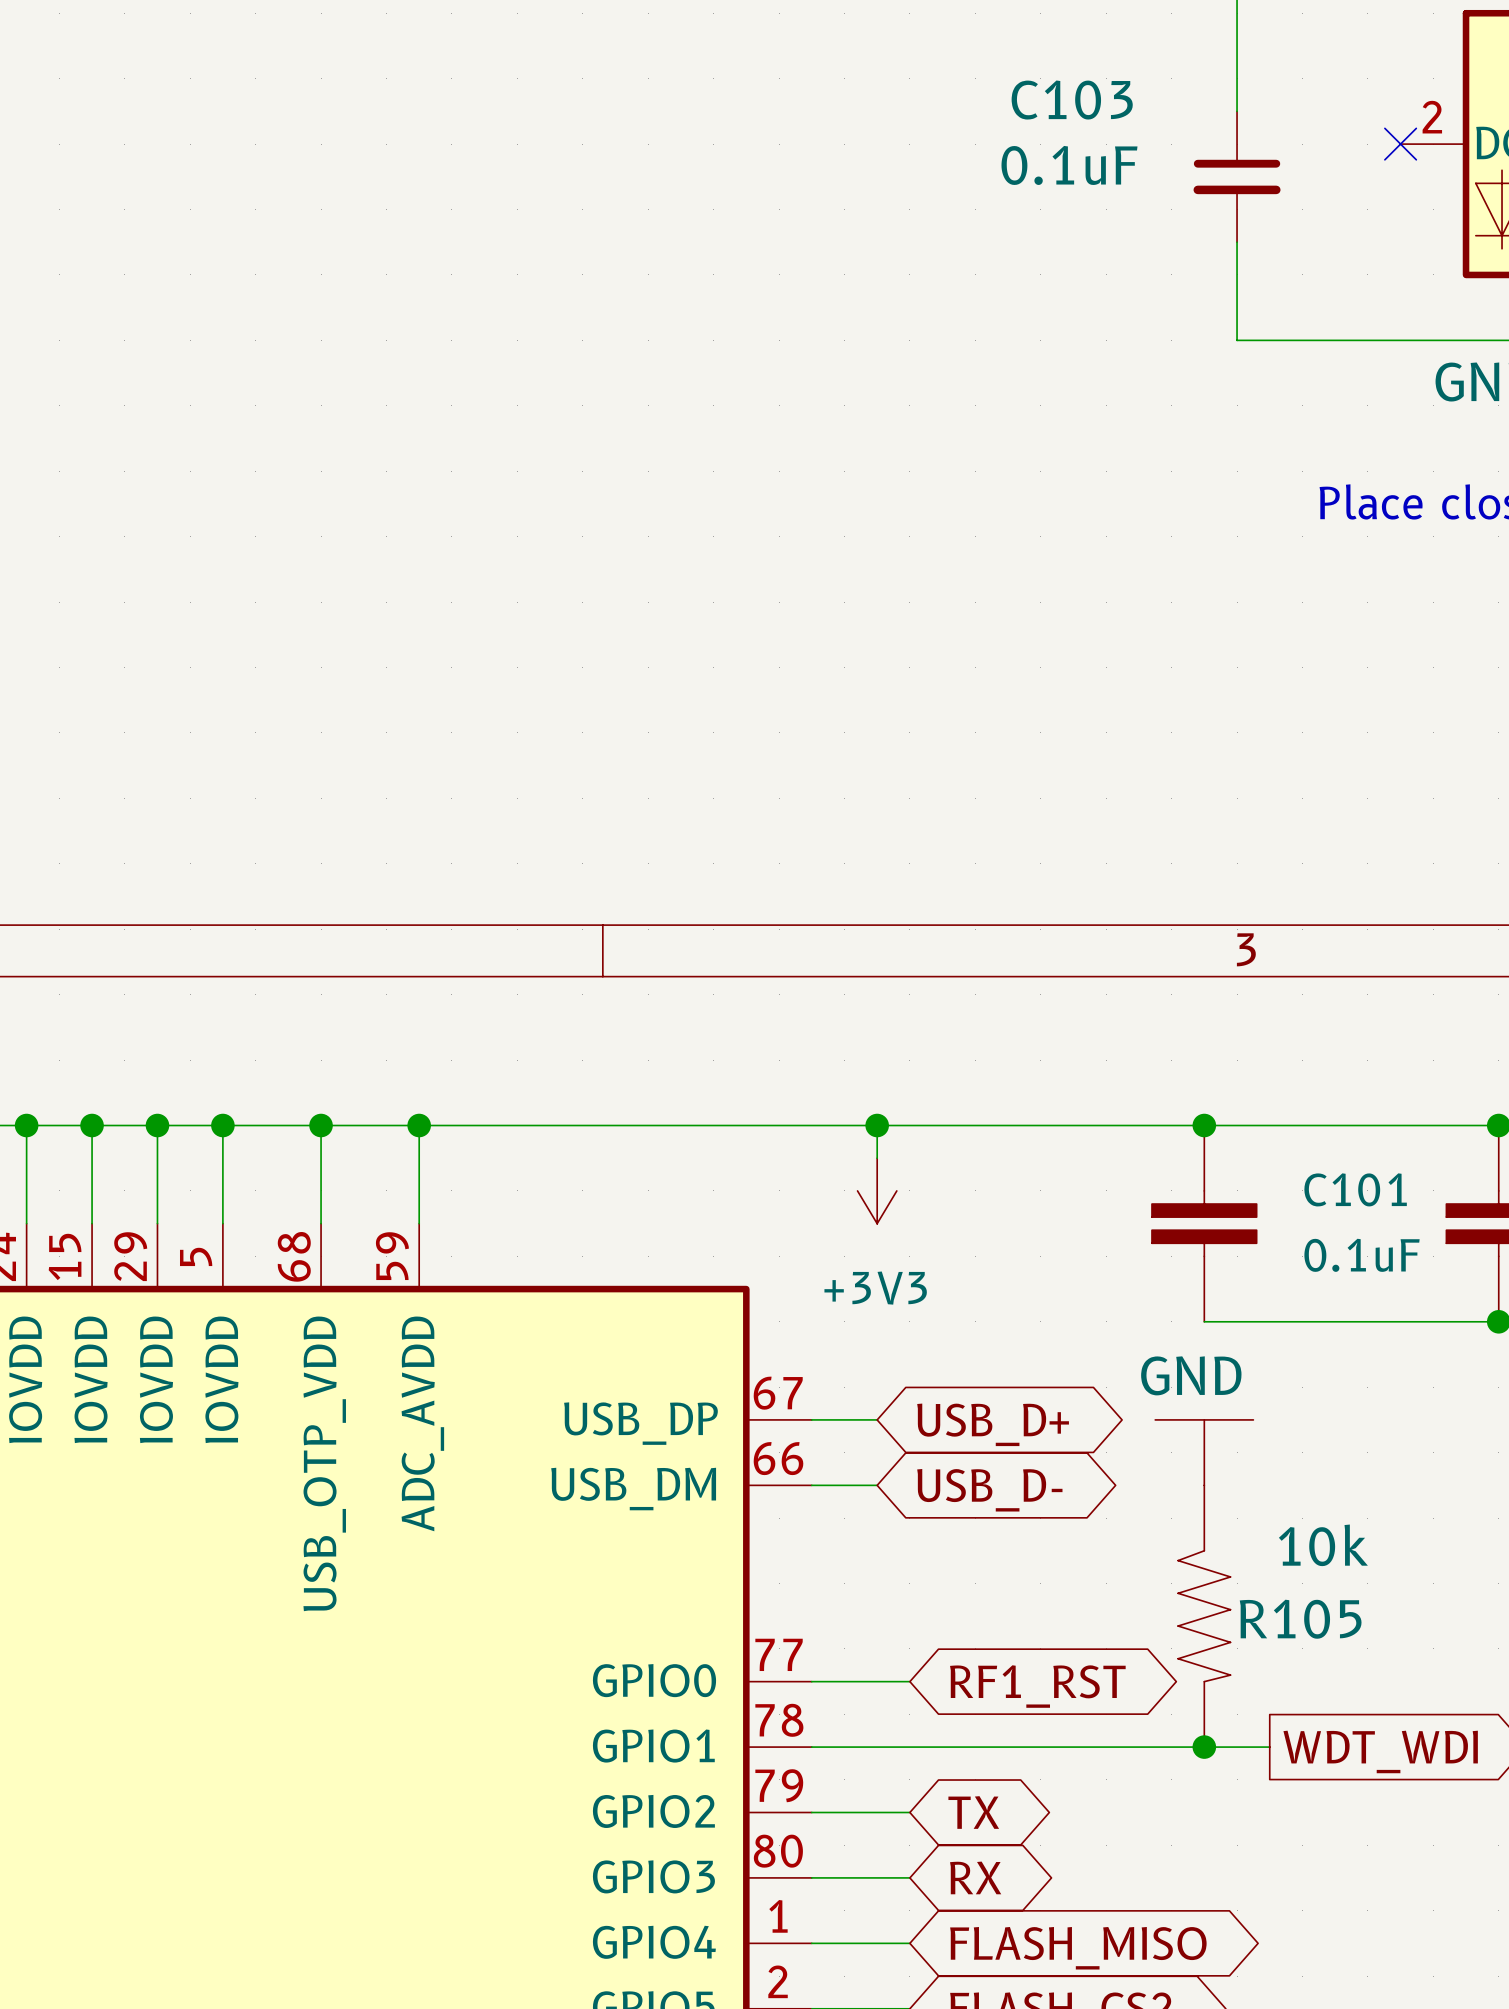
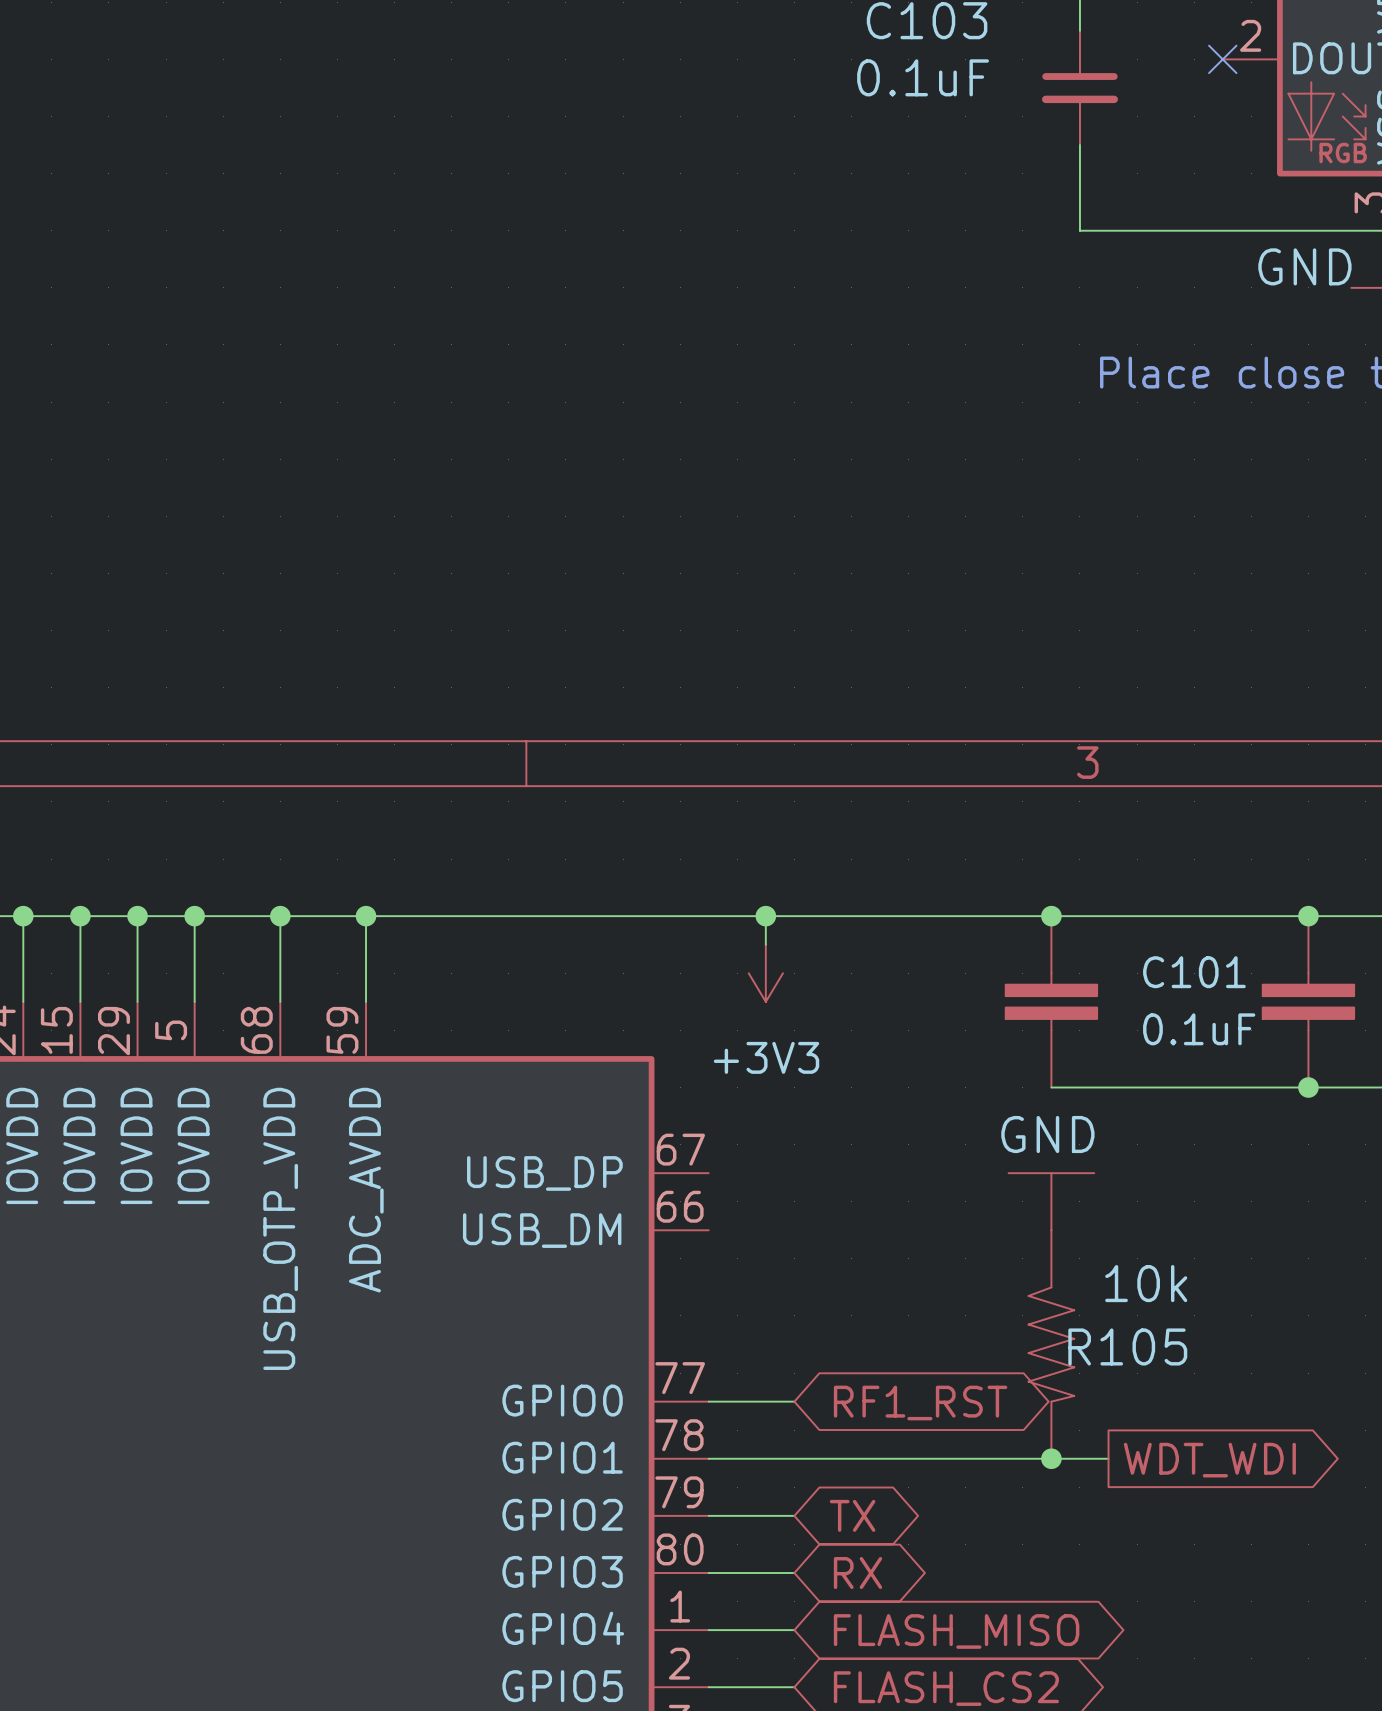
wire: (811, 1419) (877, 1419) -> none
global label: USB_D+ (993, 1424) -> none
wire: (811, 1485) (877, 1485) -> none
global label: USB_D- (989, 1490) -> none

